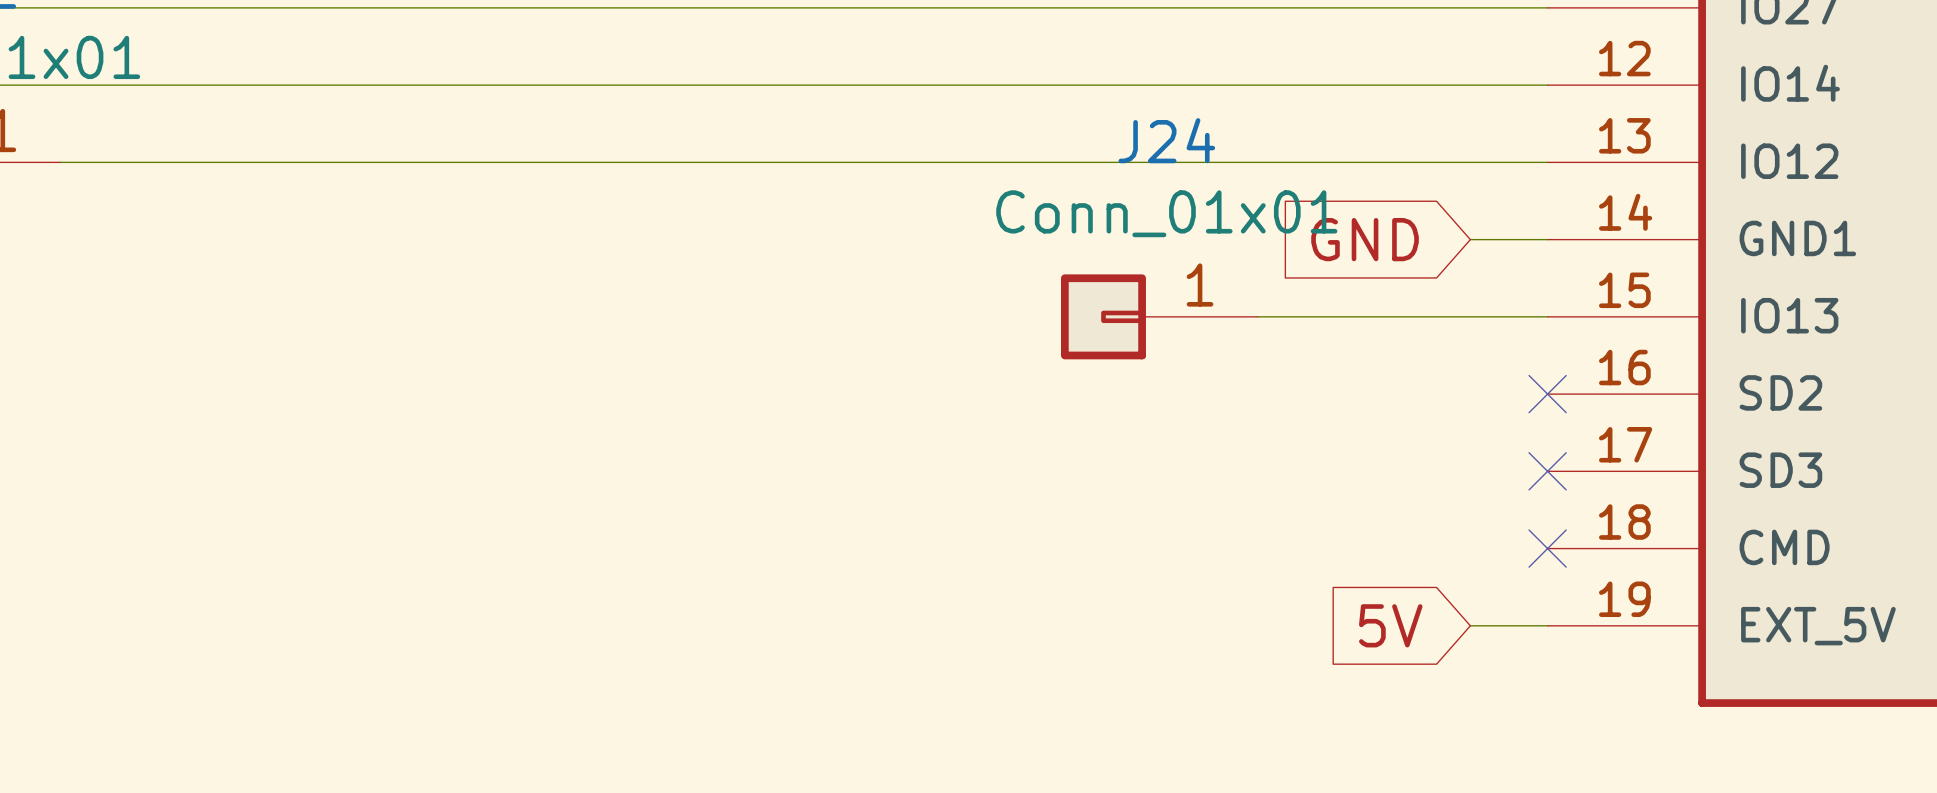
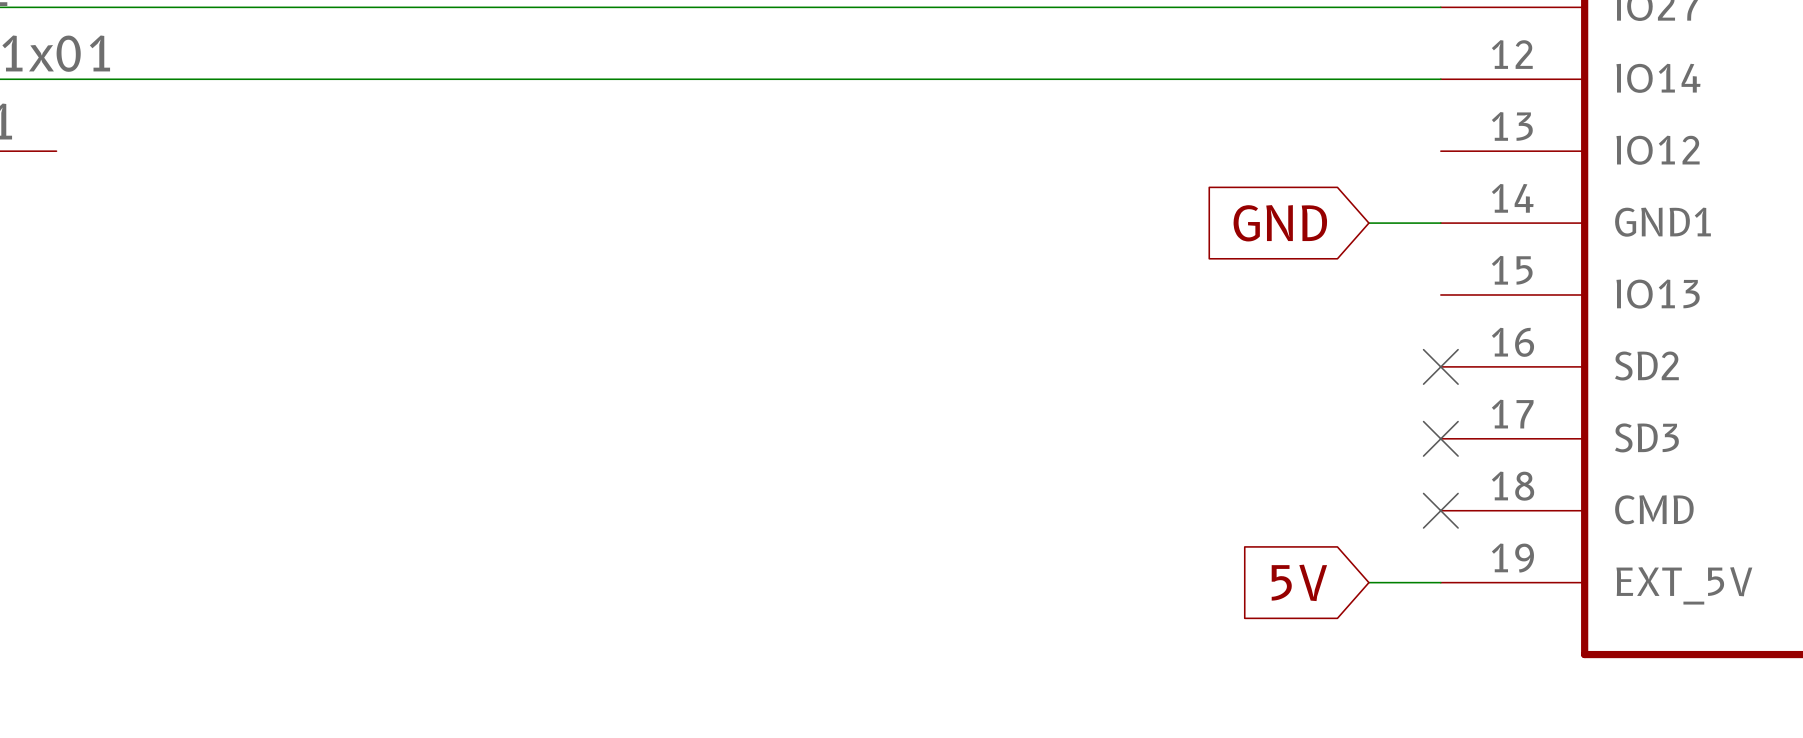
wire: (60, 162) (1547, 162) -> none
J24: Conn_01x01 (1159, 316) -> none
wire: (1257, 316) (1547, 316) -> none

